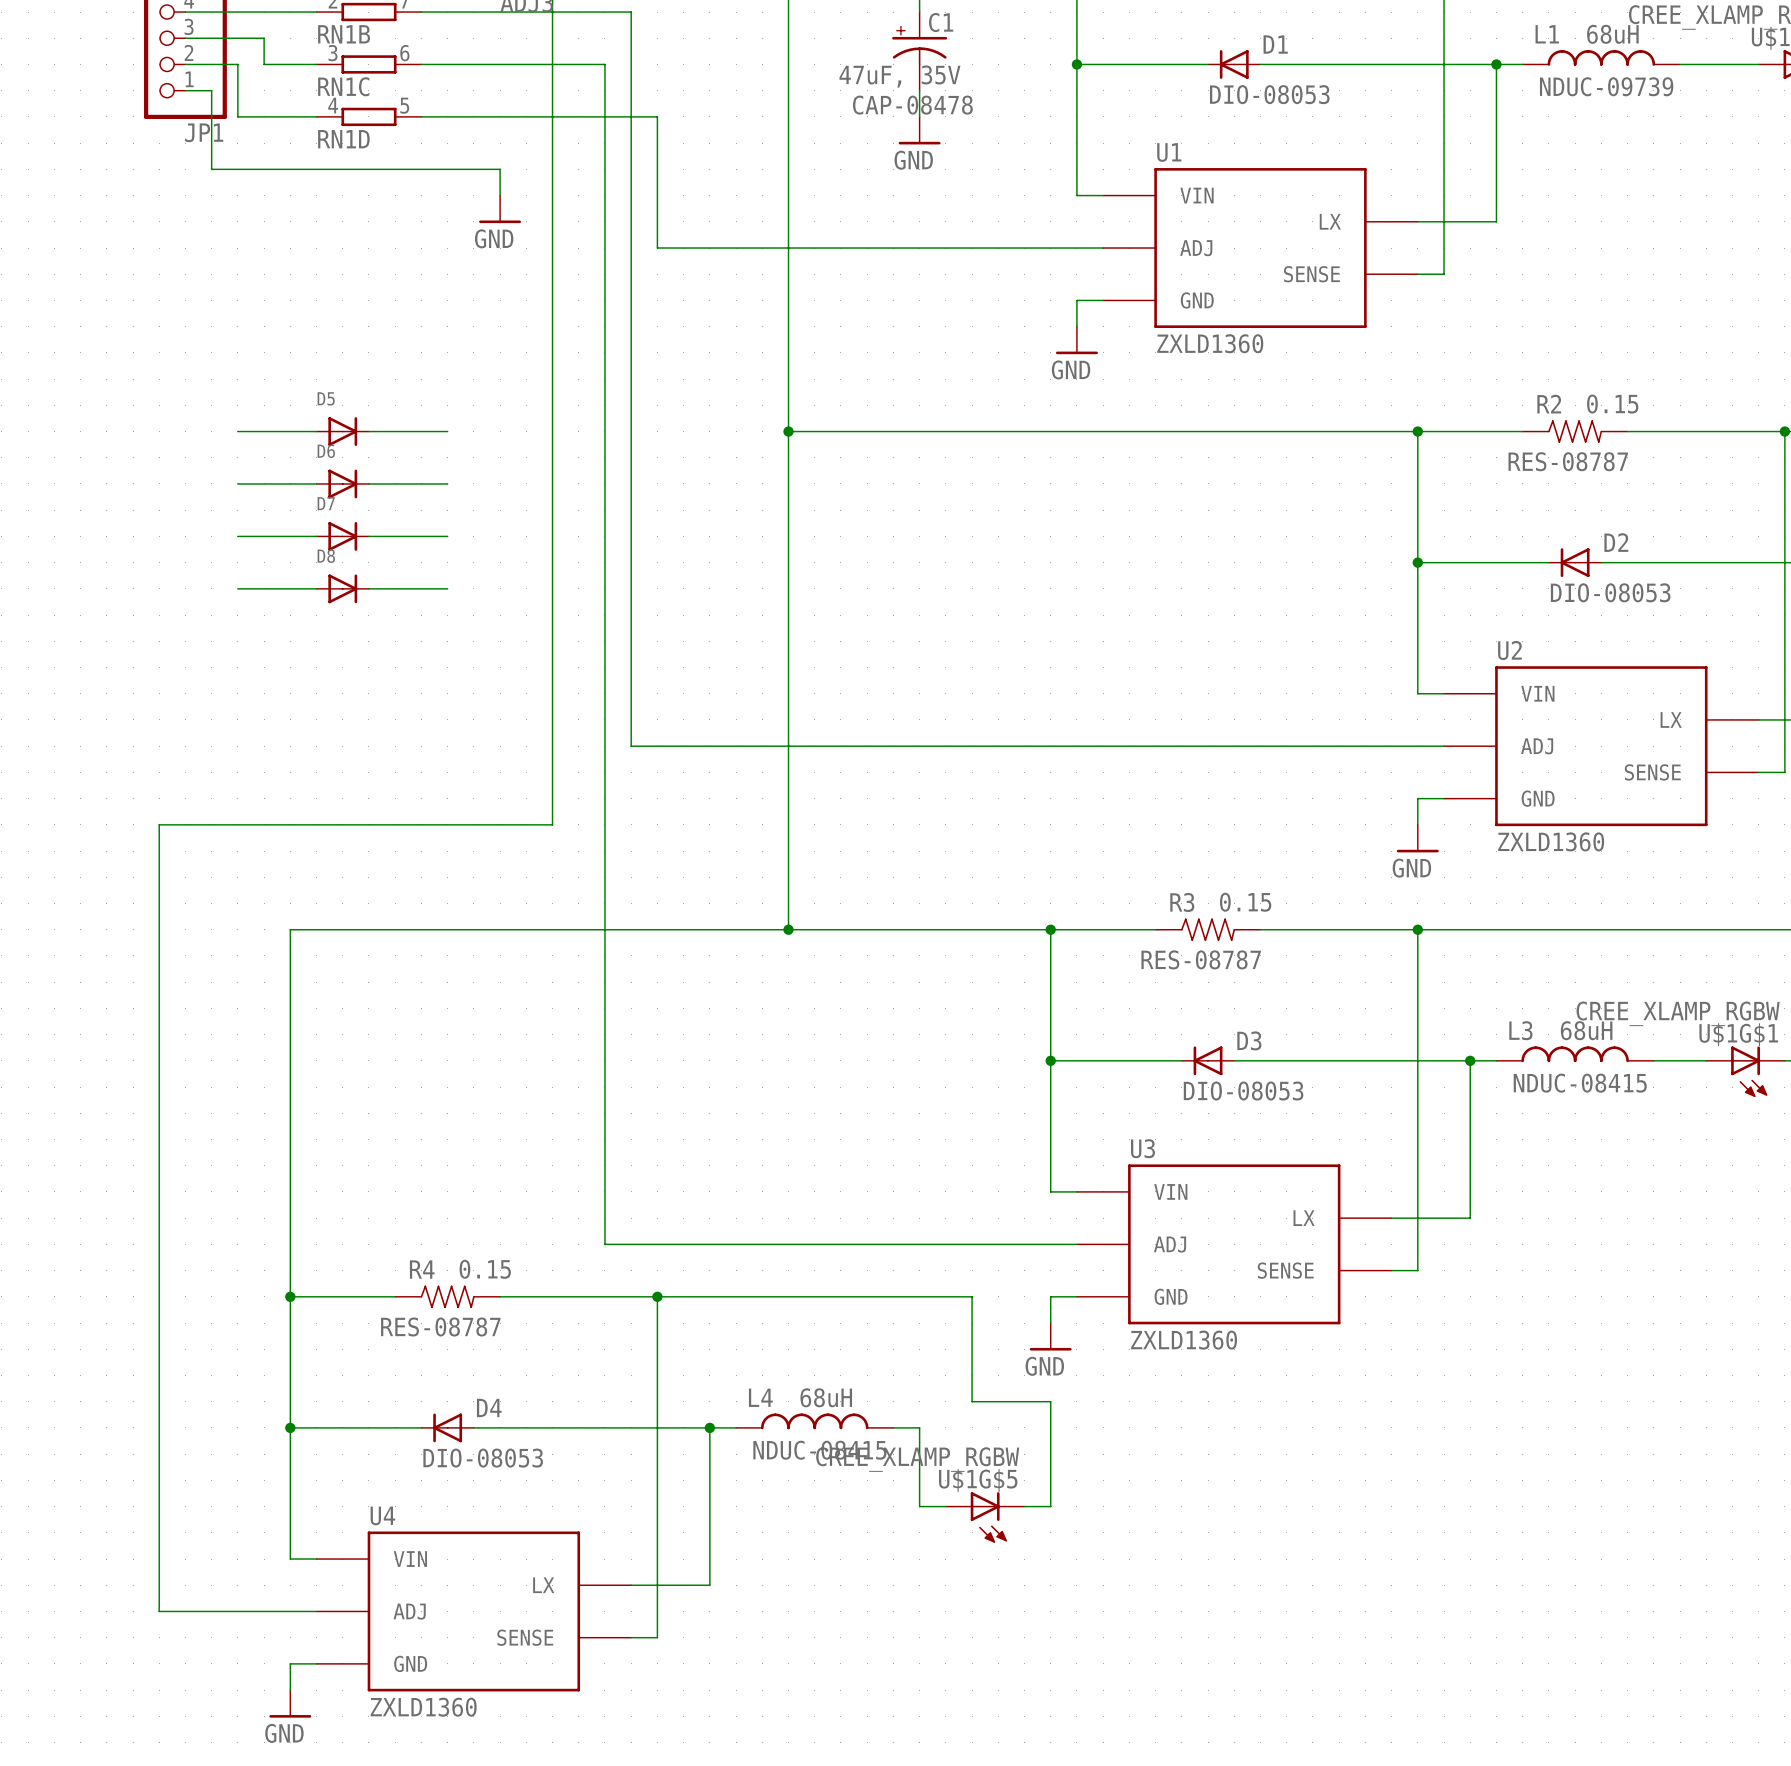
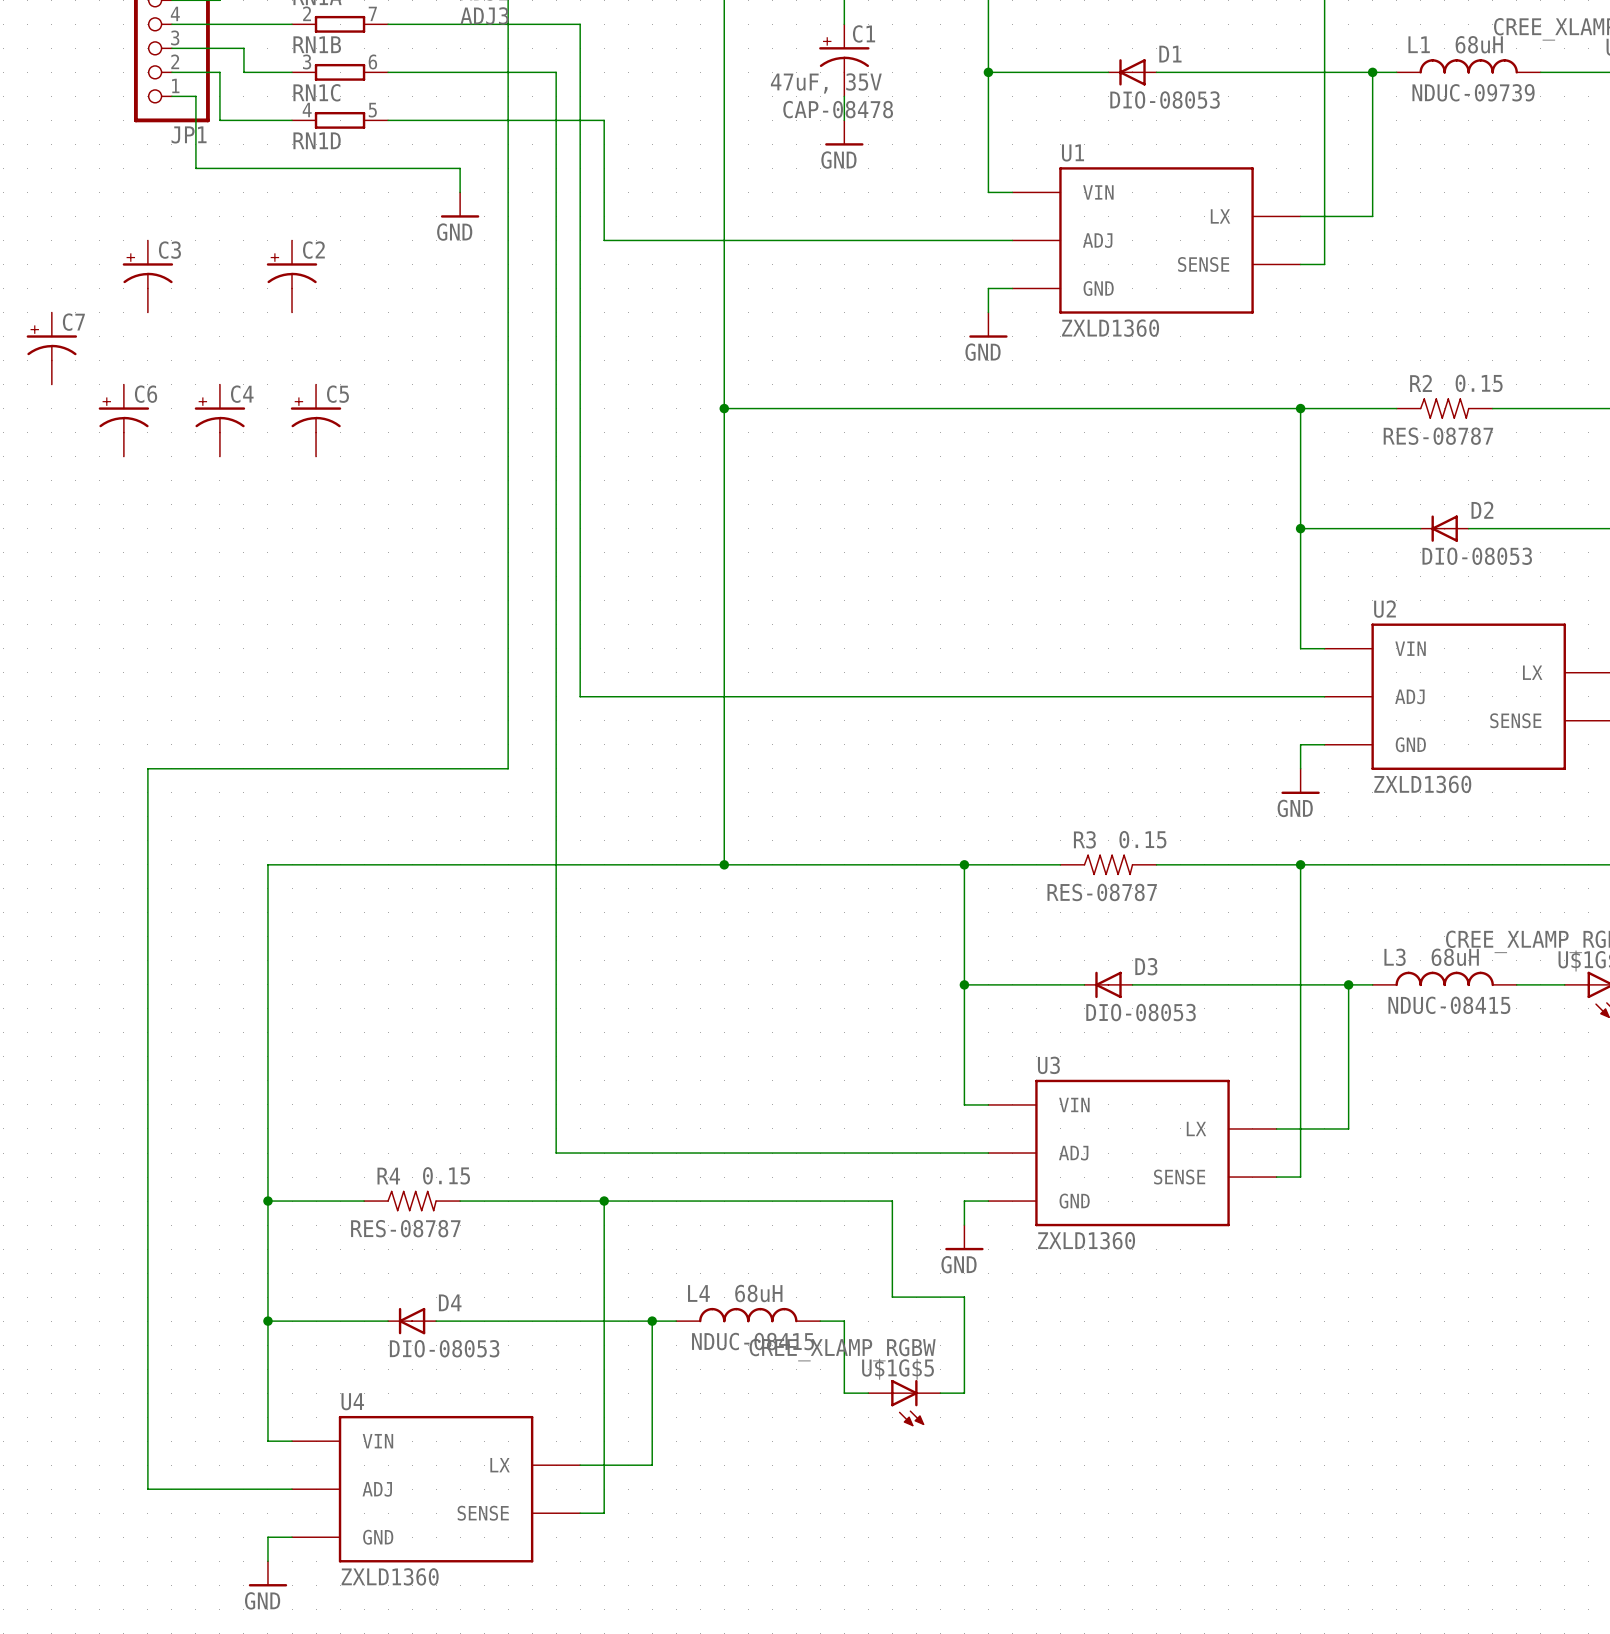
C3: none -> (147, 276)
C2: none -> (292, 276)
C7: none -> (51, 348)
wire: (237, 431) (316, 431) -> none
D5: (342, 431) -> none
wire: (368, 431) (447, 431) -> none
C6: none -> (123, 420)
C4: none -> (219, 420)
C5: none -> (316, 420)
wire: (237, 483) (316, 483) -> none
D6: (342, 483) -> none
wire: (368, 483) (447, 483) -> none
wire: (237, 536) (316, 536) -> none
D7: (342, 536) -> none
wire: (368, 536) (447, 536) -> none
wire: (237, 588) (316, 588) -> none
D8: (342, 588) -> none
wire: (368, 588) (447, 588) -> none

